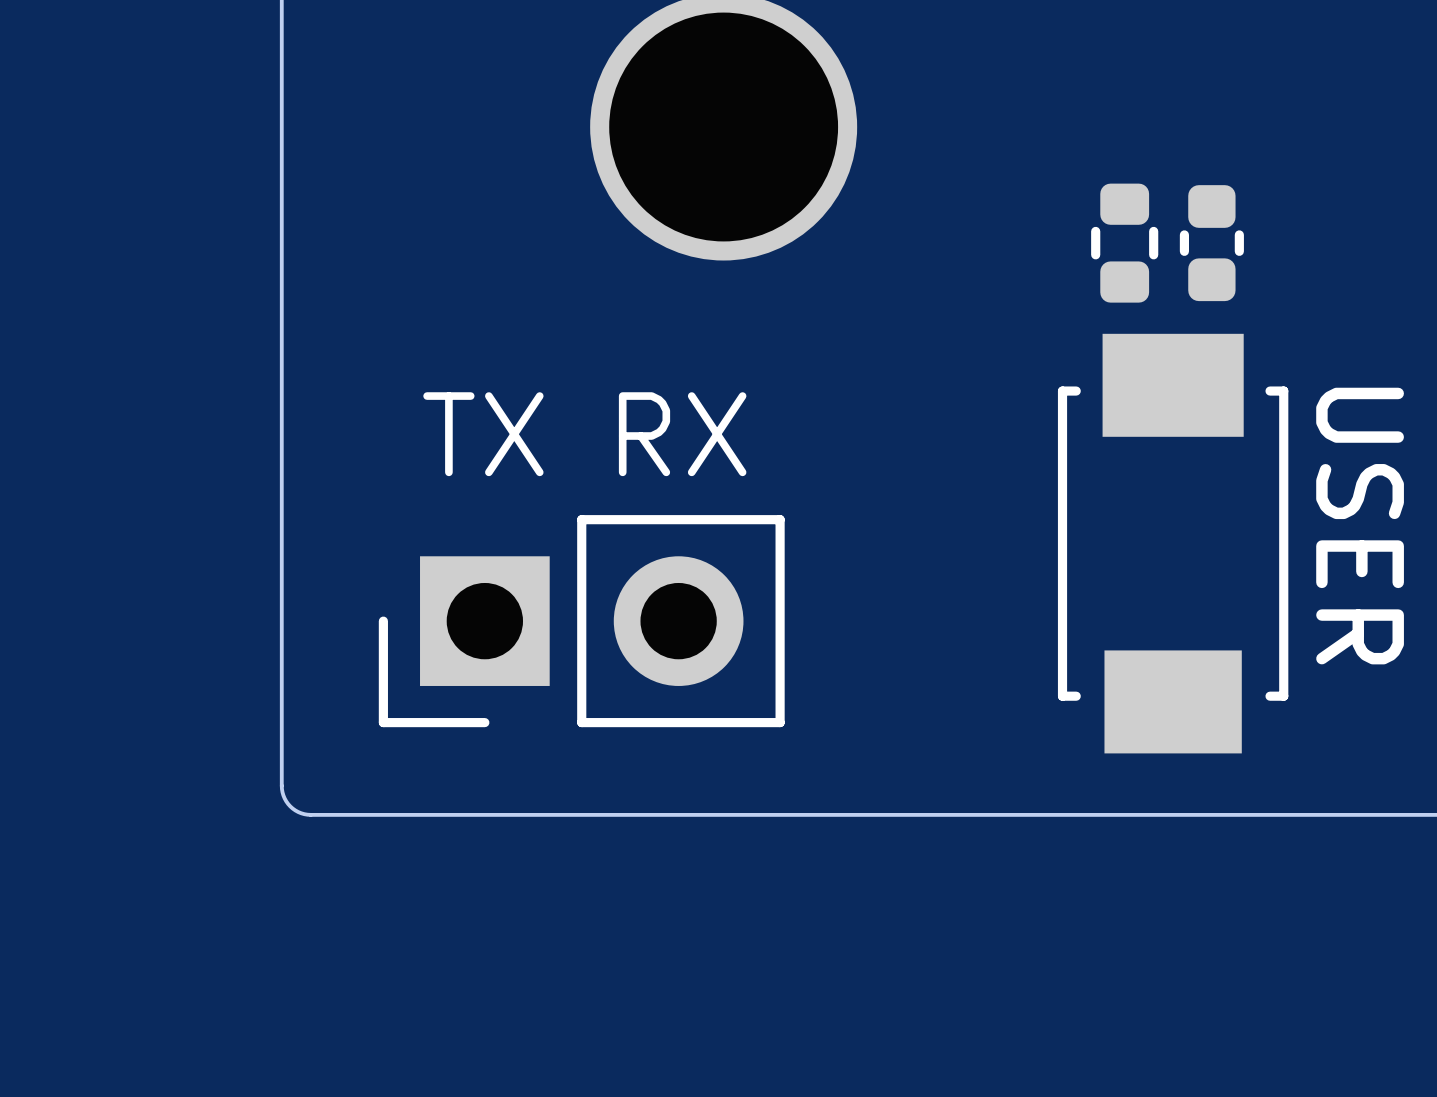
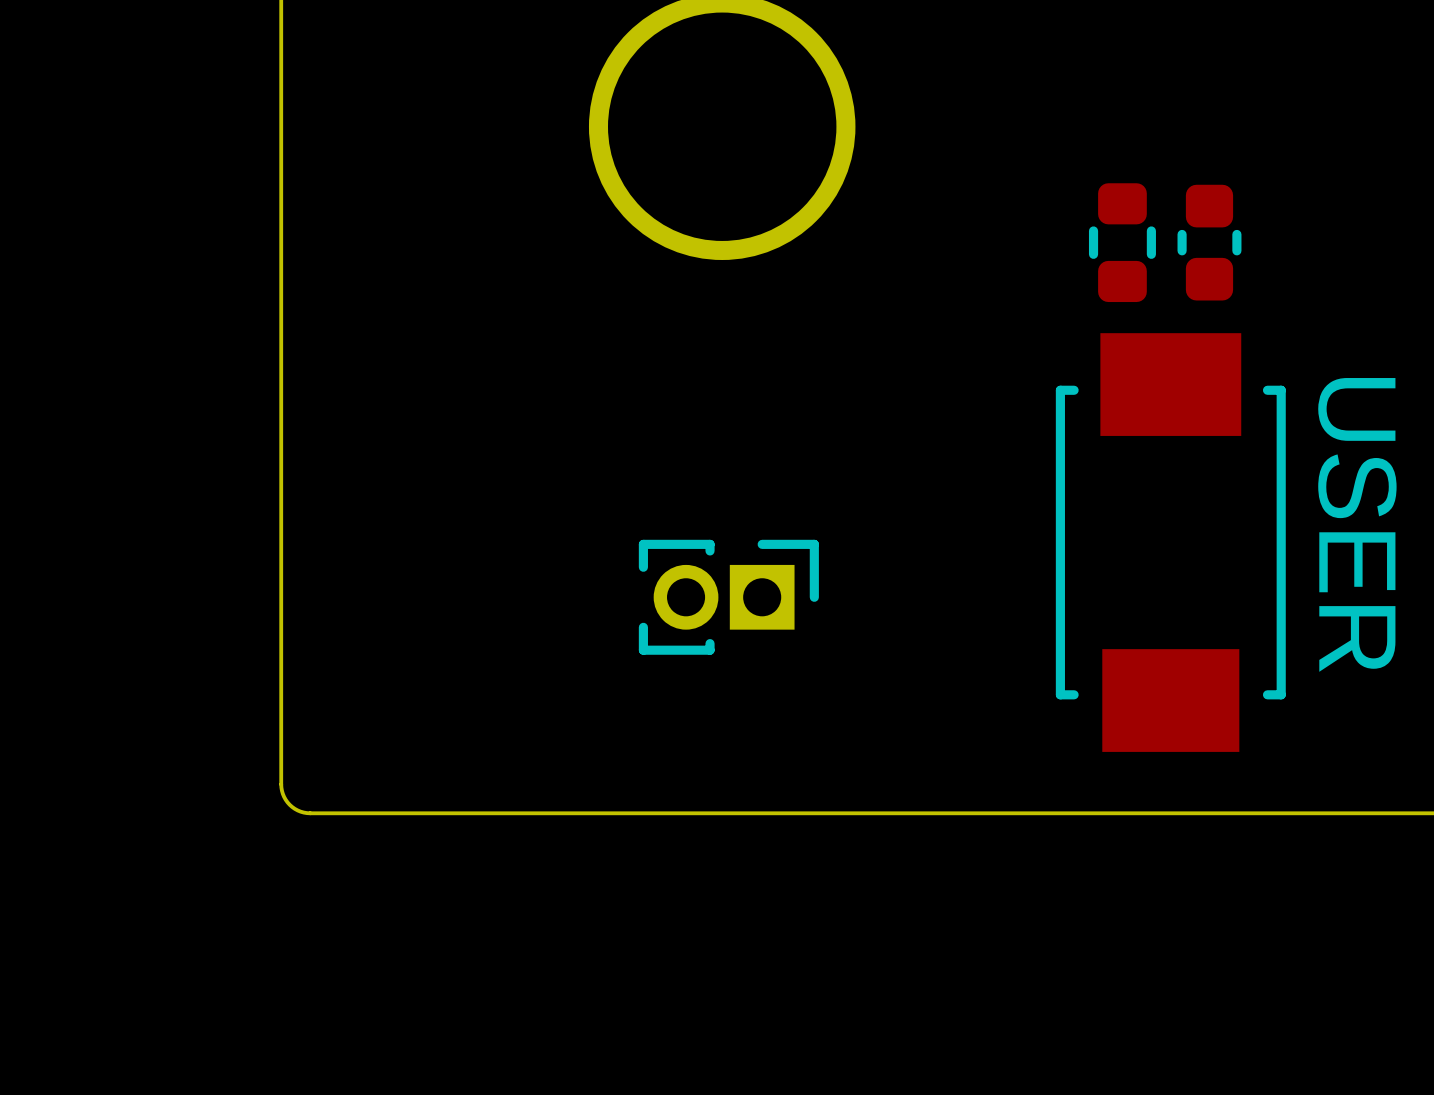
text: TX (483, 434) -> none
text: RX (682, 434) -> none
part: none -> (728, 597)
part: (581, 621) -> none

